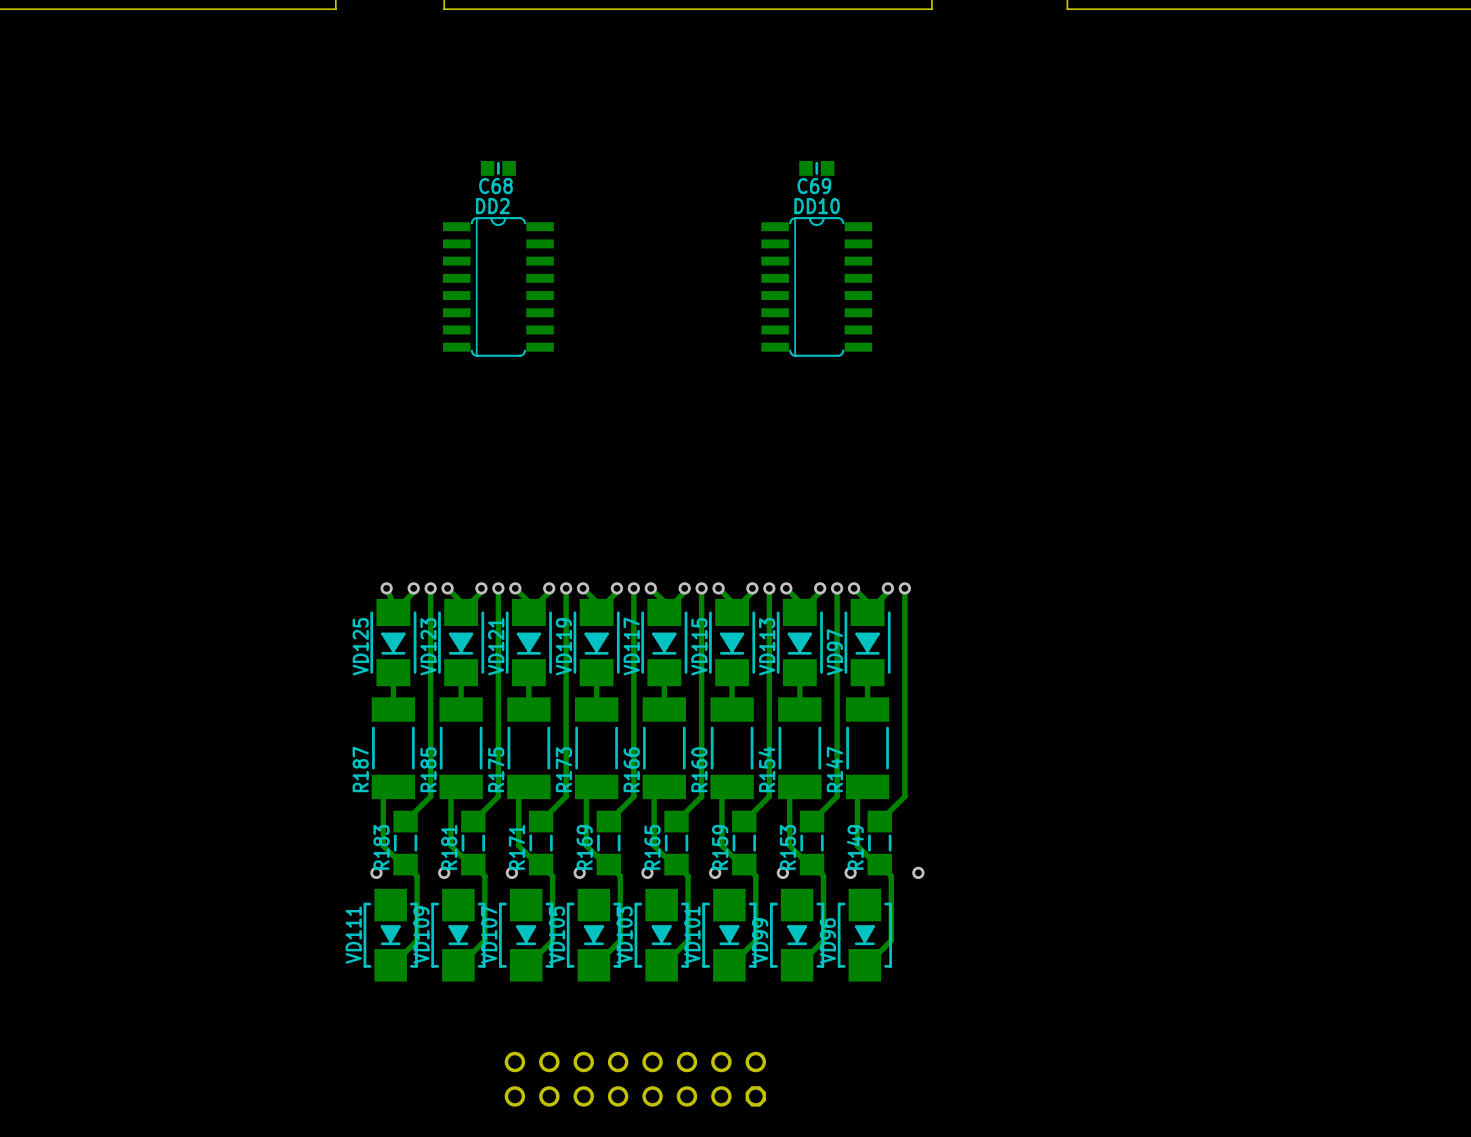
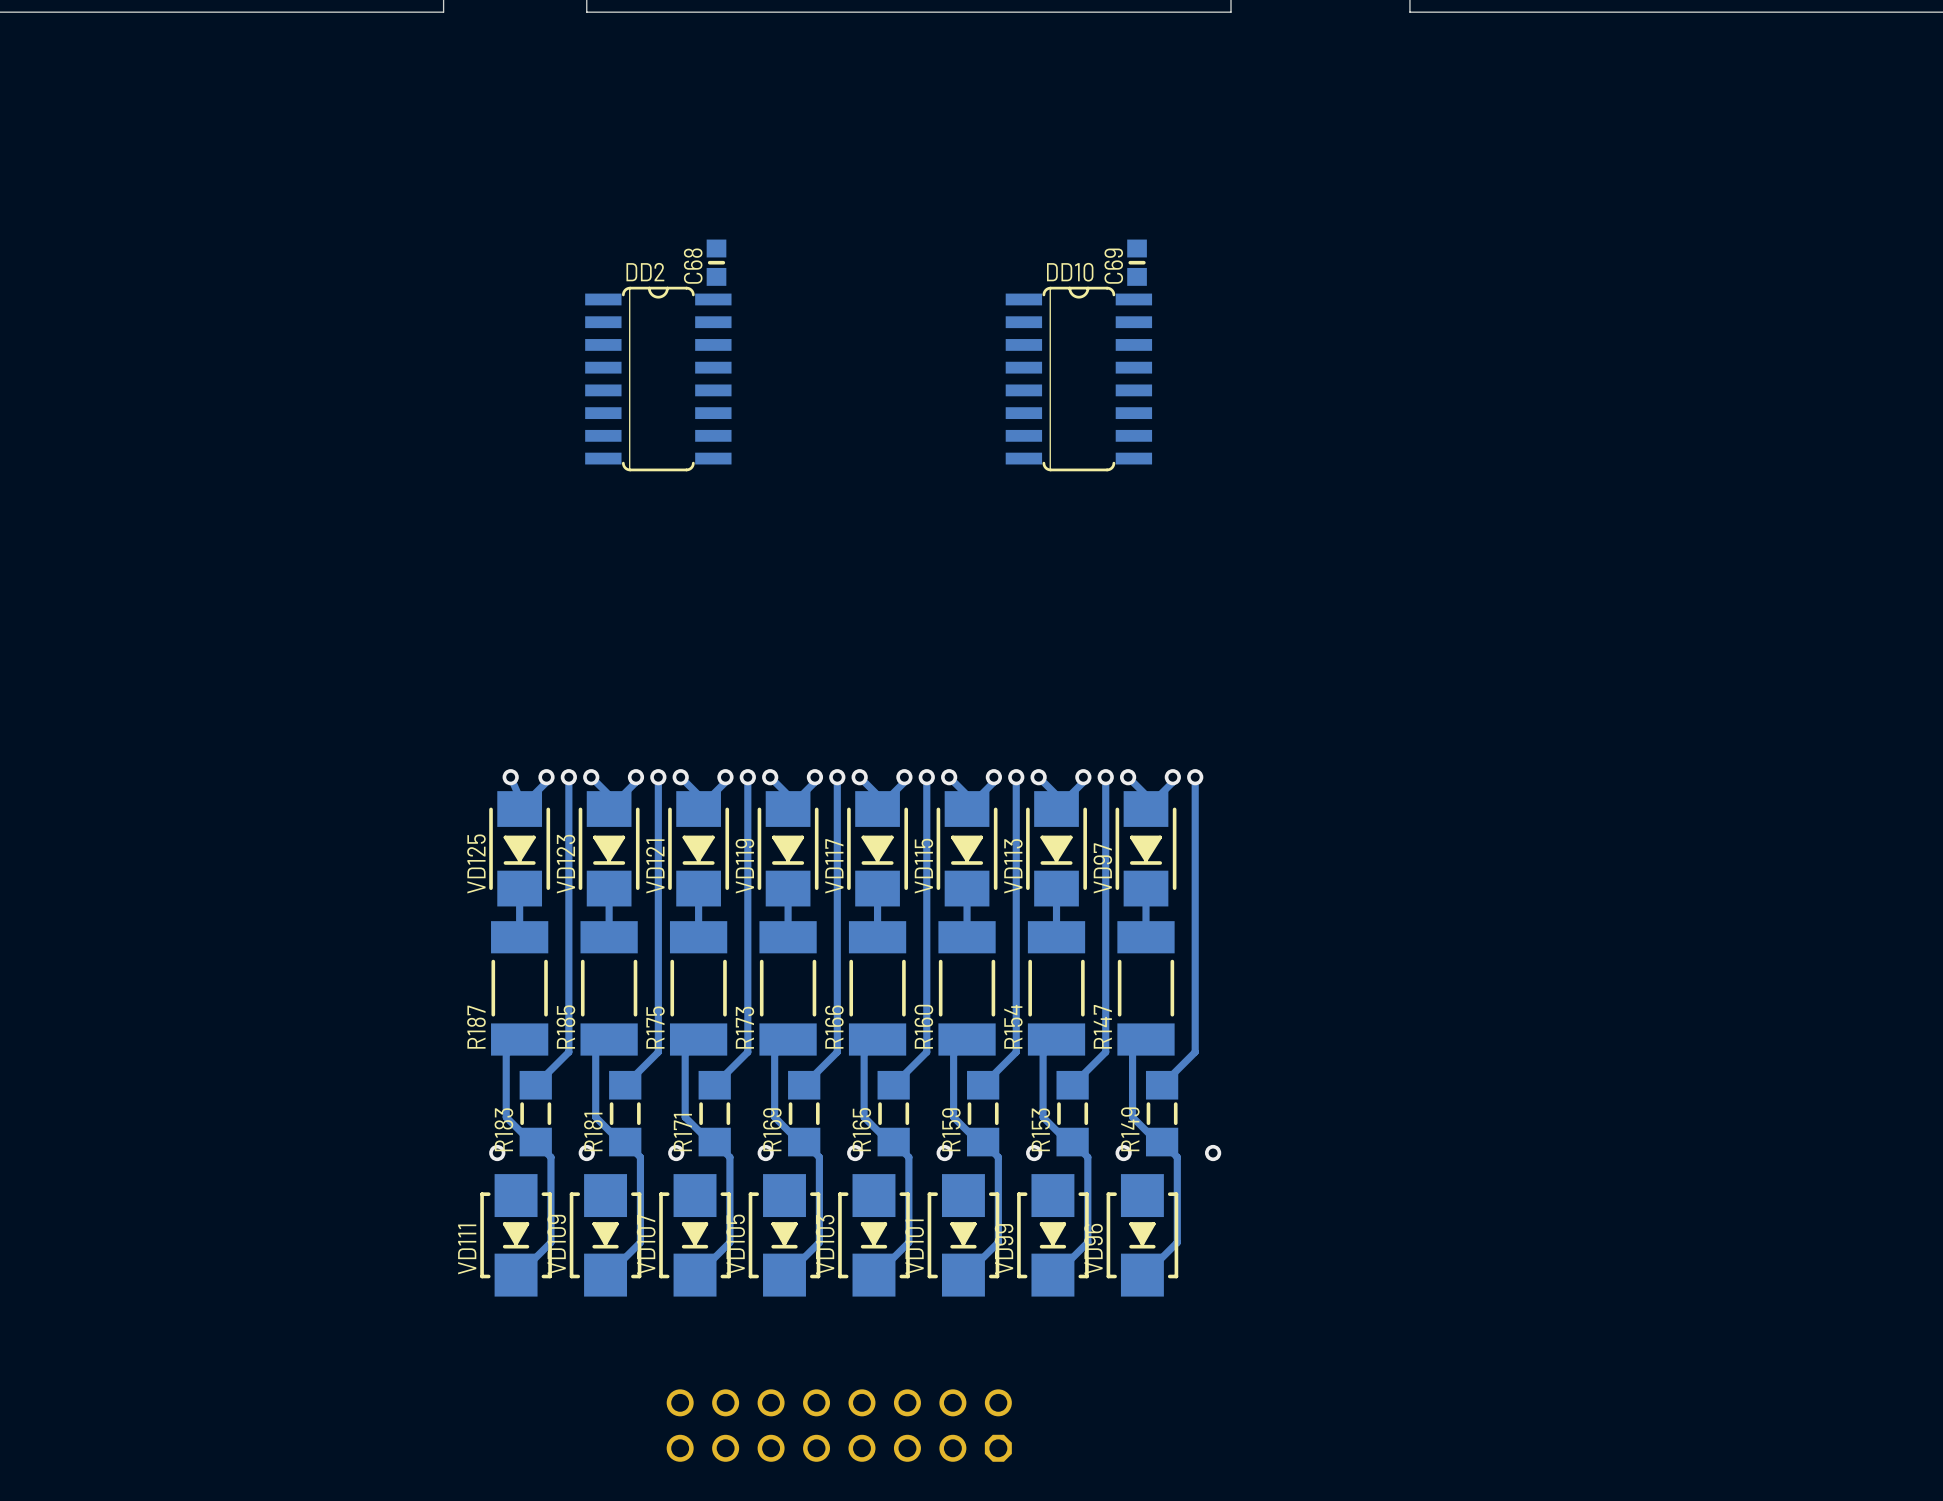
C68 rotation: 0° (498, 168) -> 90° clockwise (716, 262)
C68 position: (498, 168) -> (716, 262)
C69 rotation: 0° (816, 168) -> 90° clockwise (1137, 262)
C69 position: (816, 168) -> (1137, 262)

